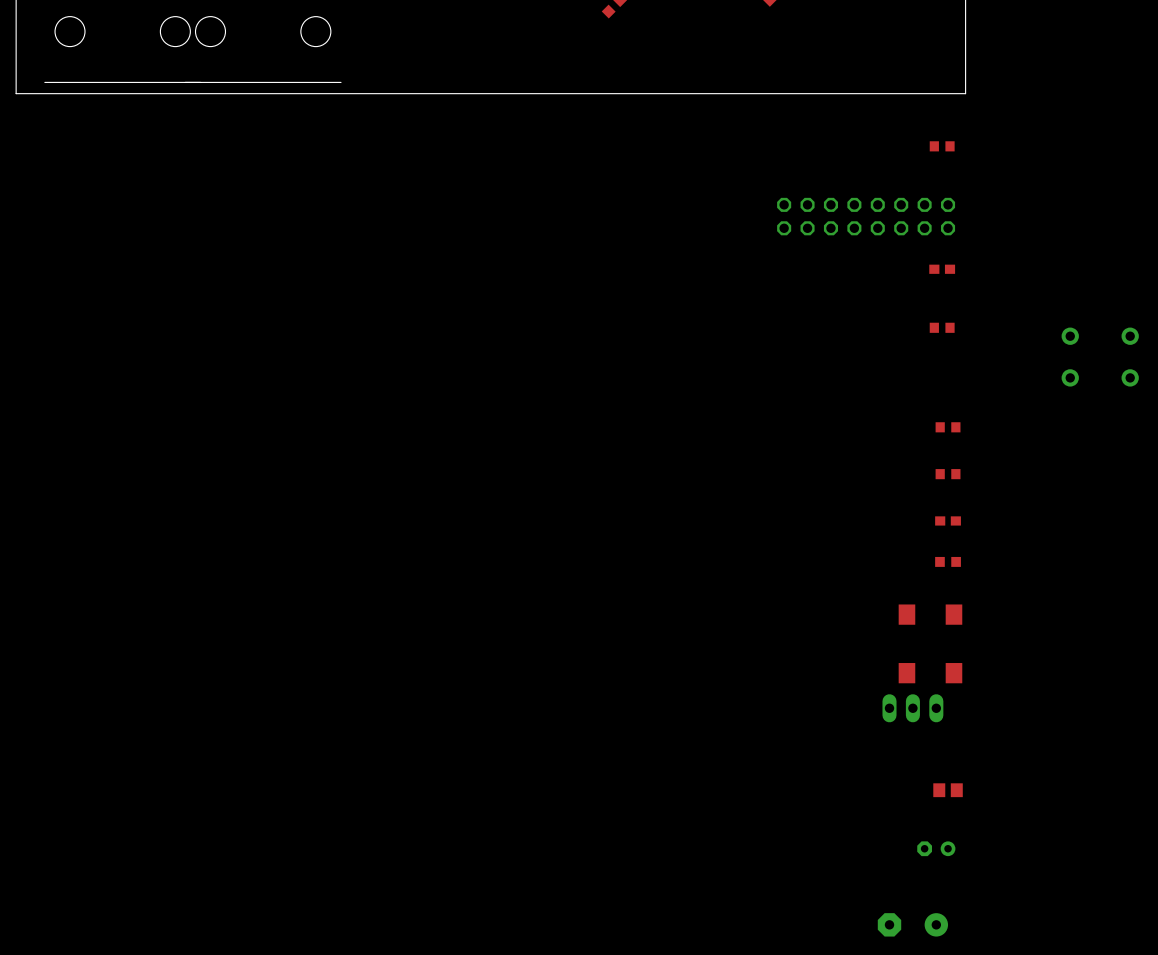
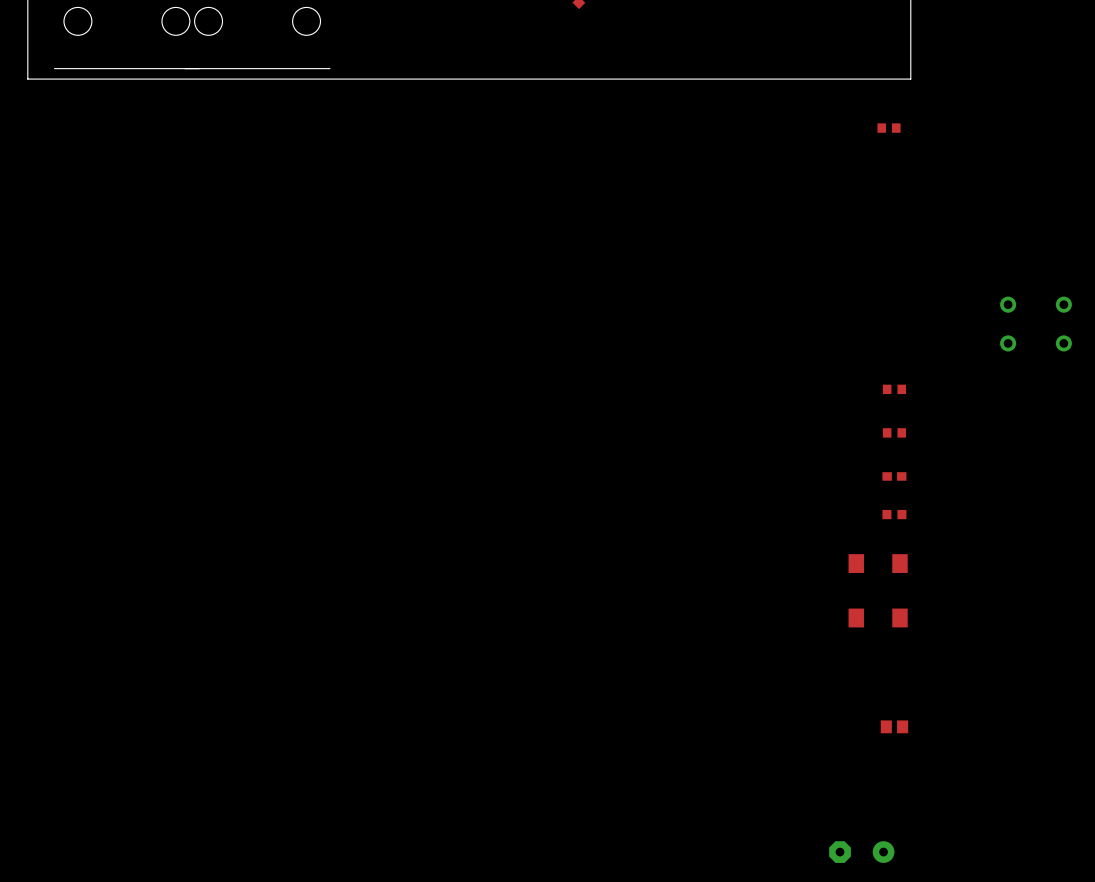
part: (866, 216) -> none
part: (942, 269) -> none
part: (942, 327) -> none
part: (912, 708) -> none
part: (936, 848) -> none

